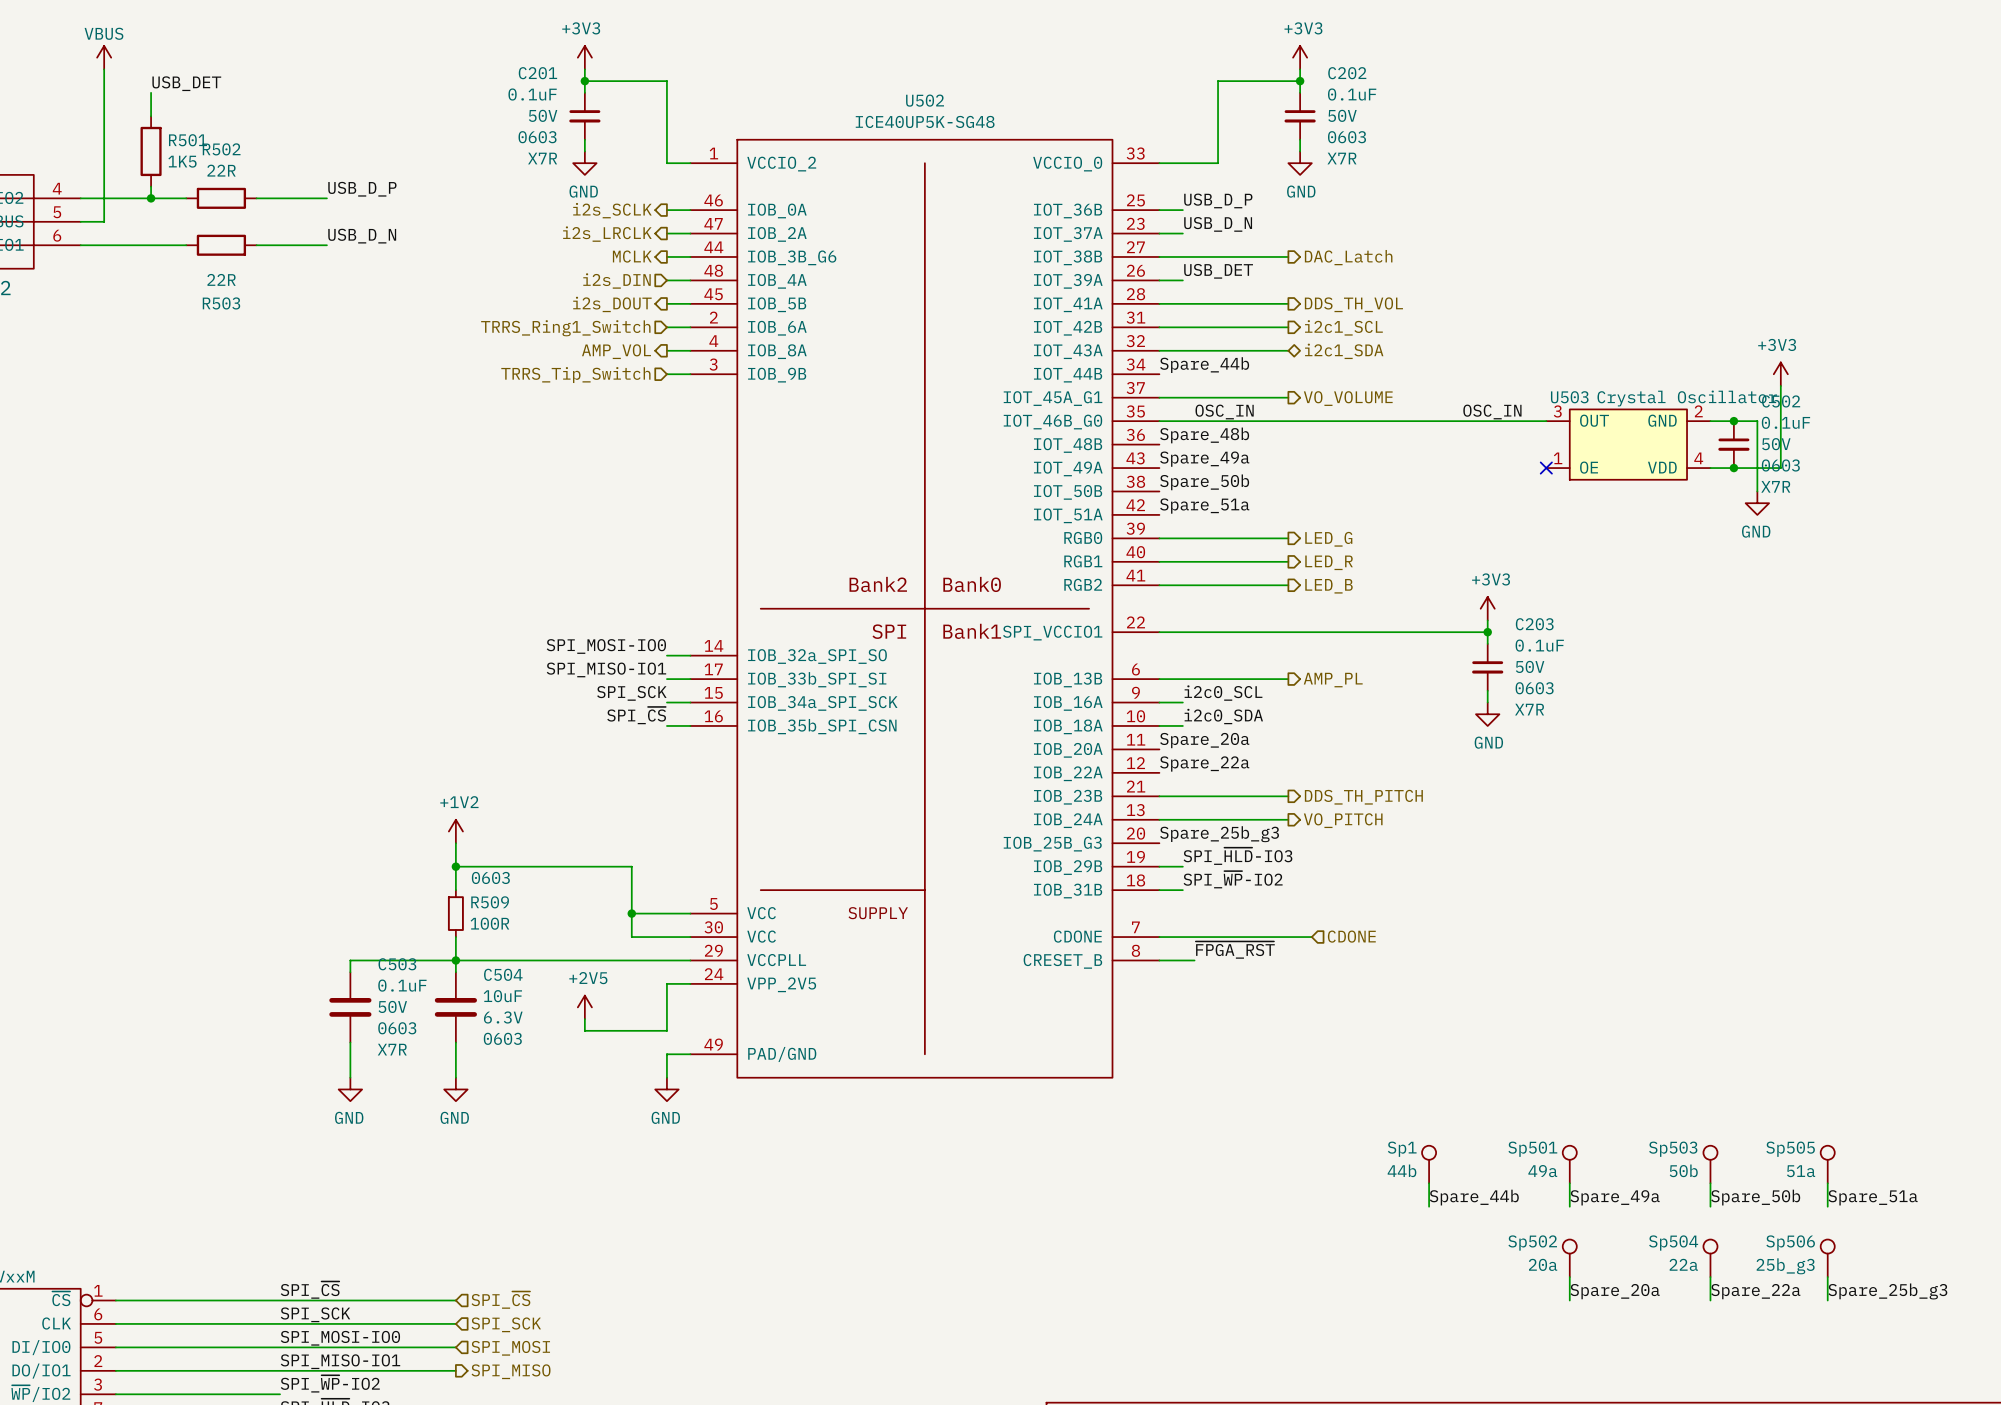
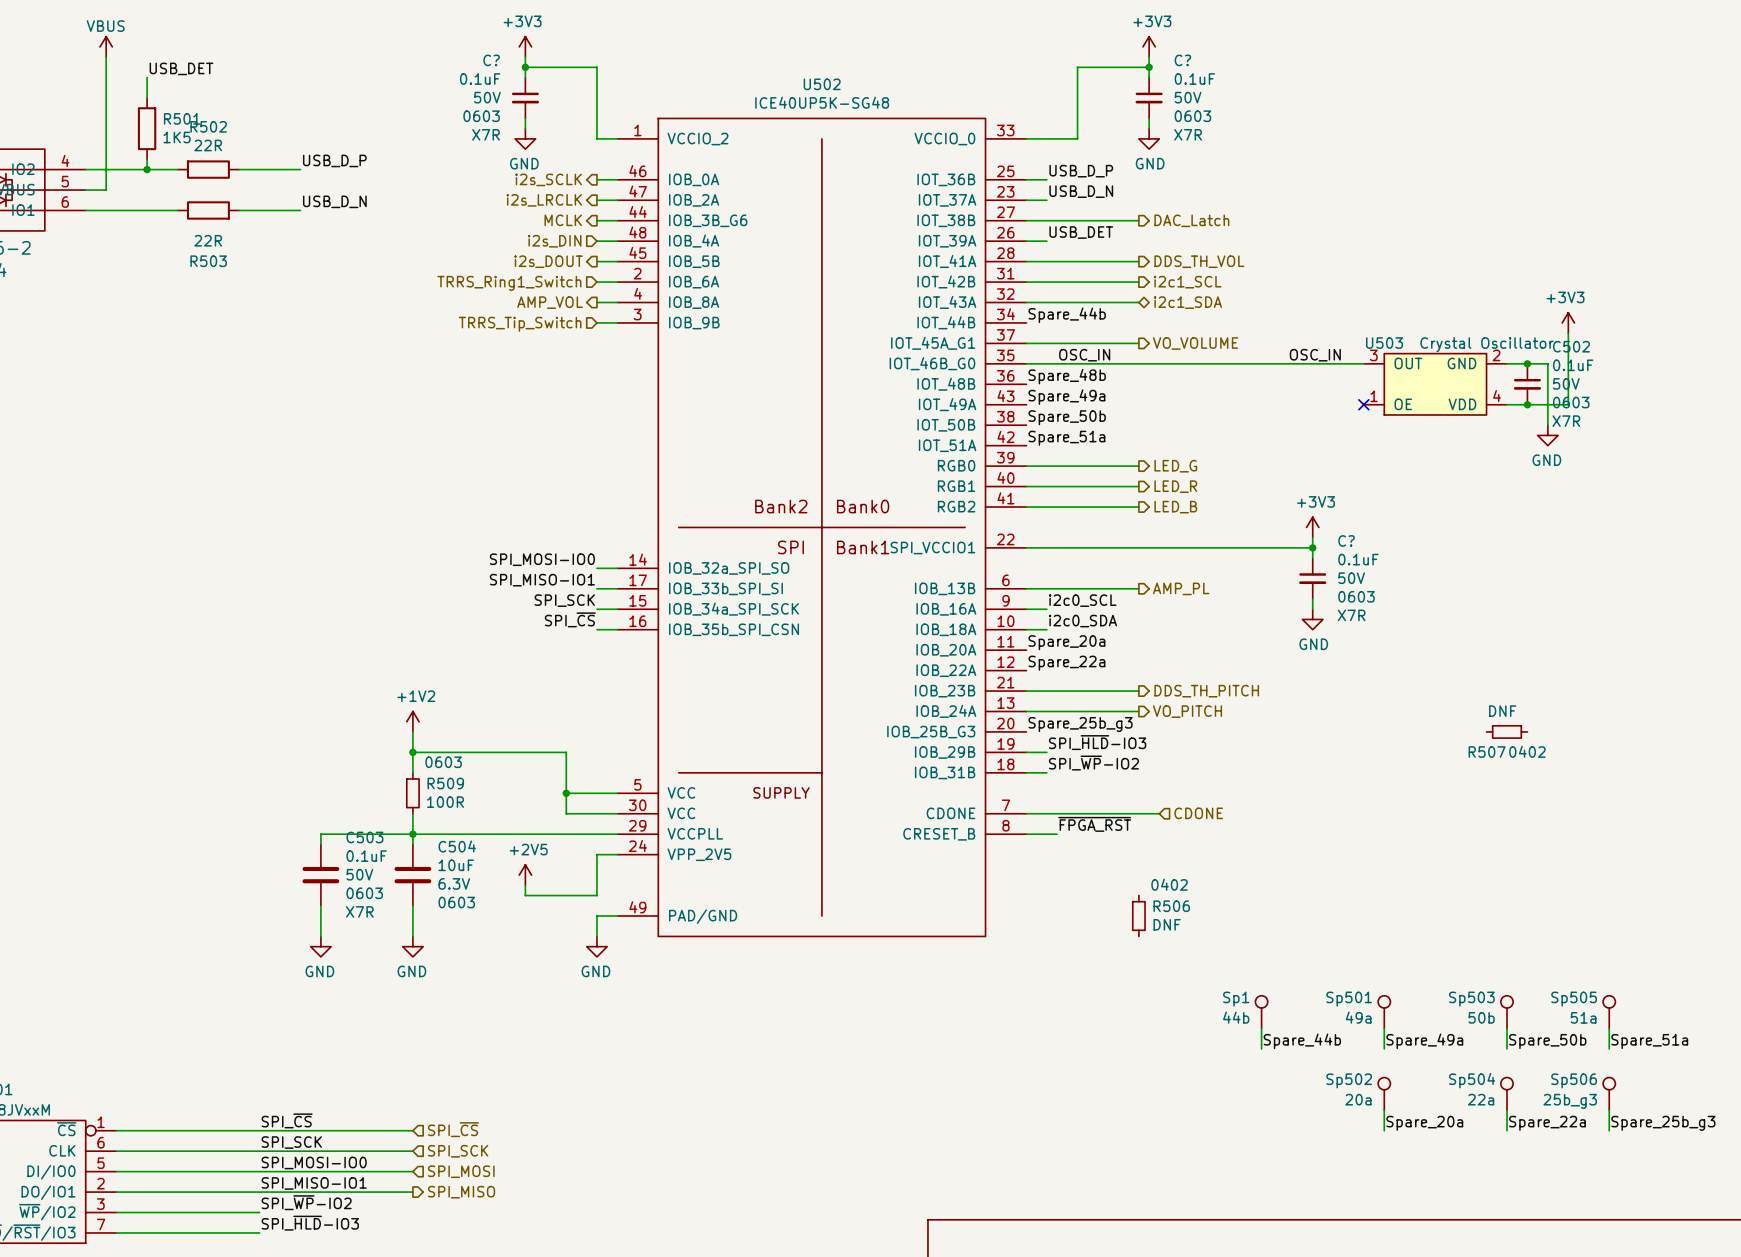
C201 name: C201 (537, 73) -> C? (491, 60)
C202 name: C202 (1347, 73) -> C? (1182, 60)
C203 name: C203 (1534, 624) -> C? (1346, 540)
R507: none -> DNF (1506, 731)
R506: none -> DNF (1138, 916)

